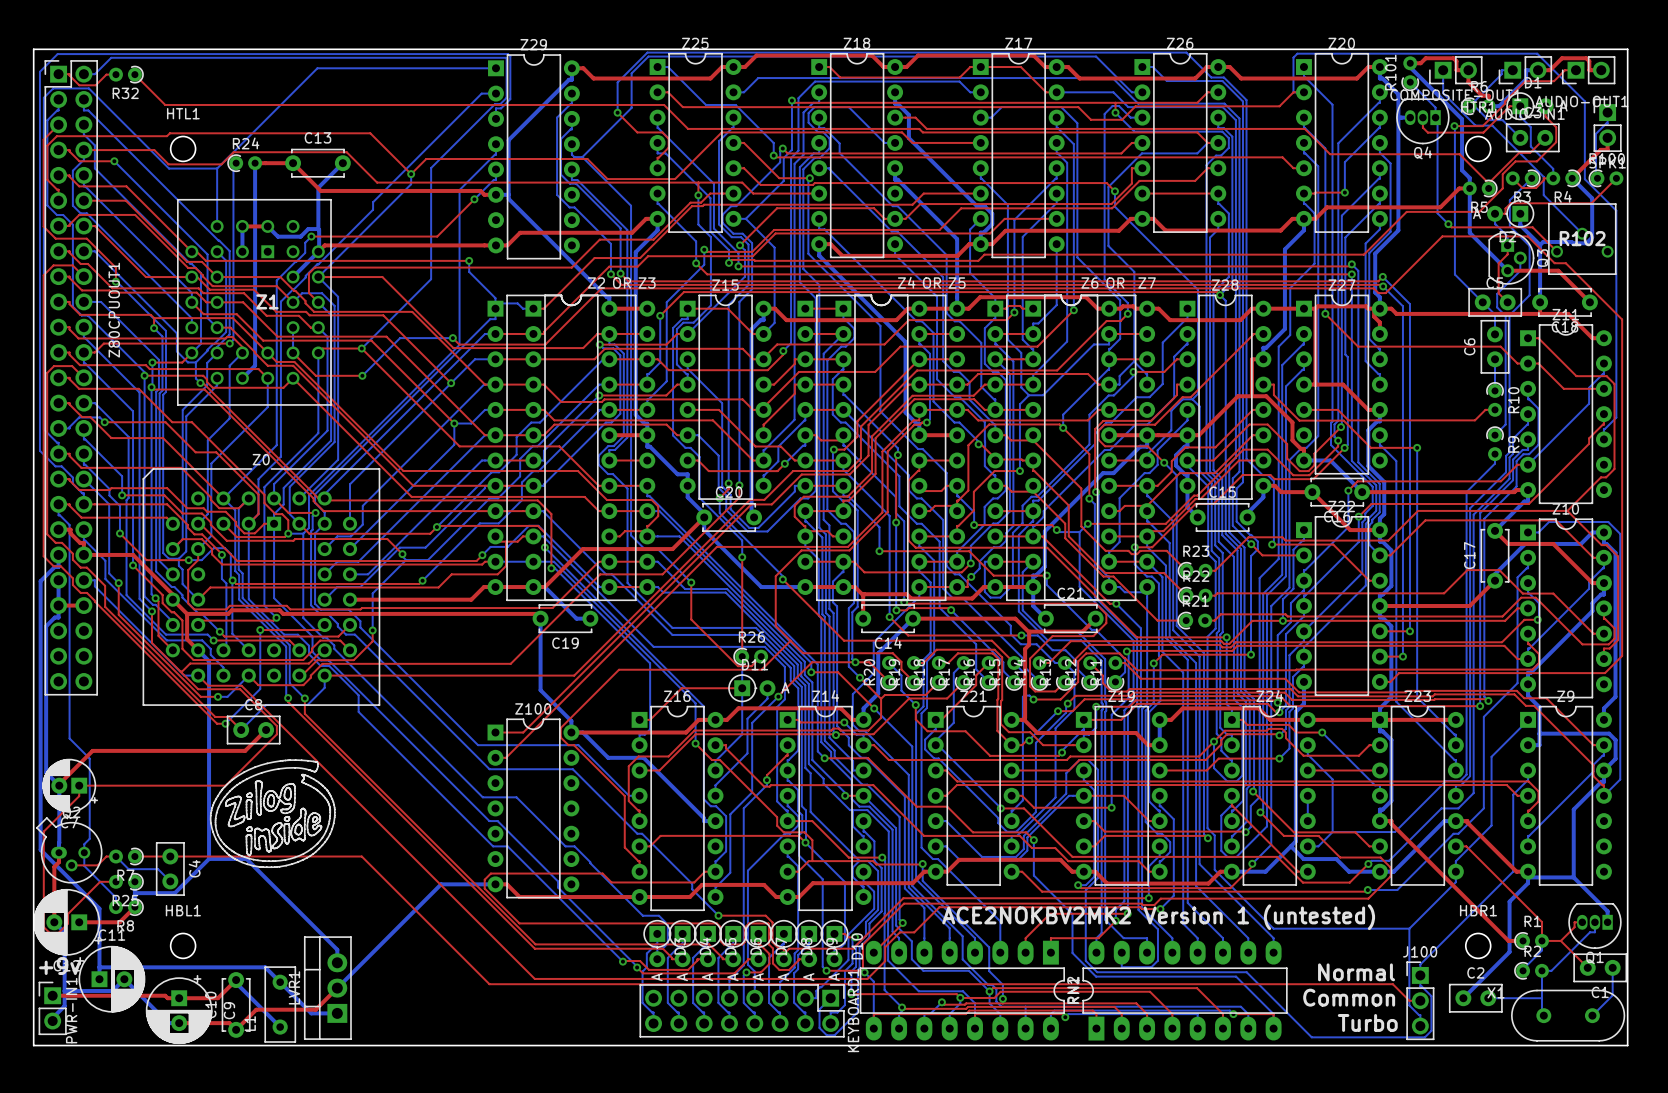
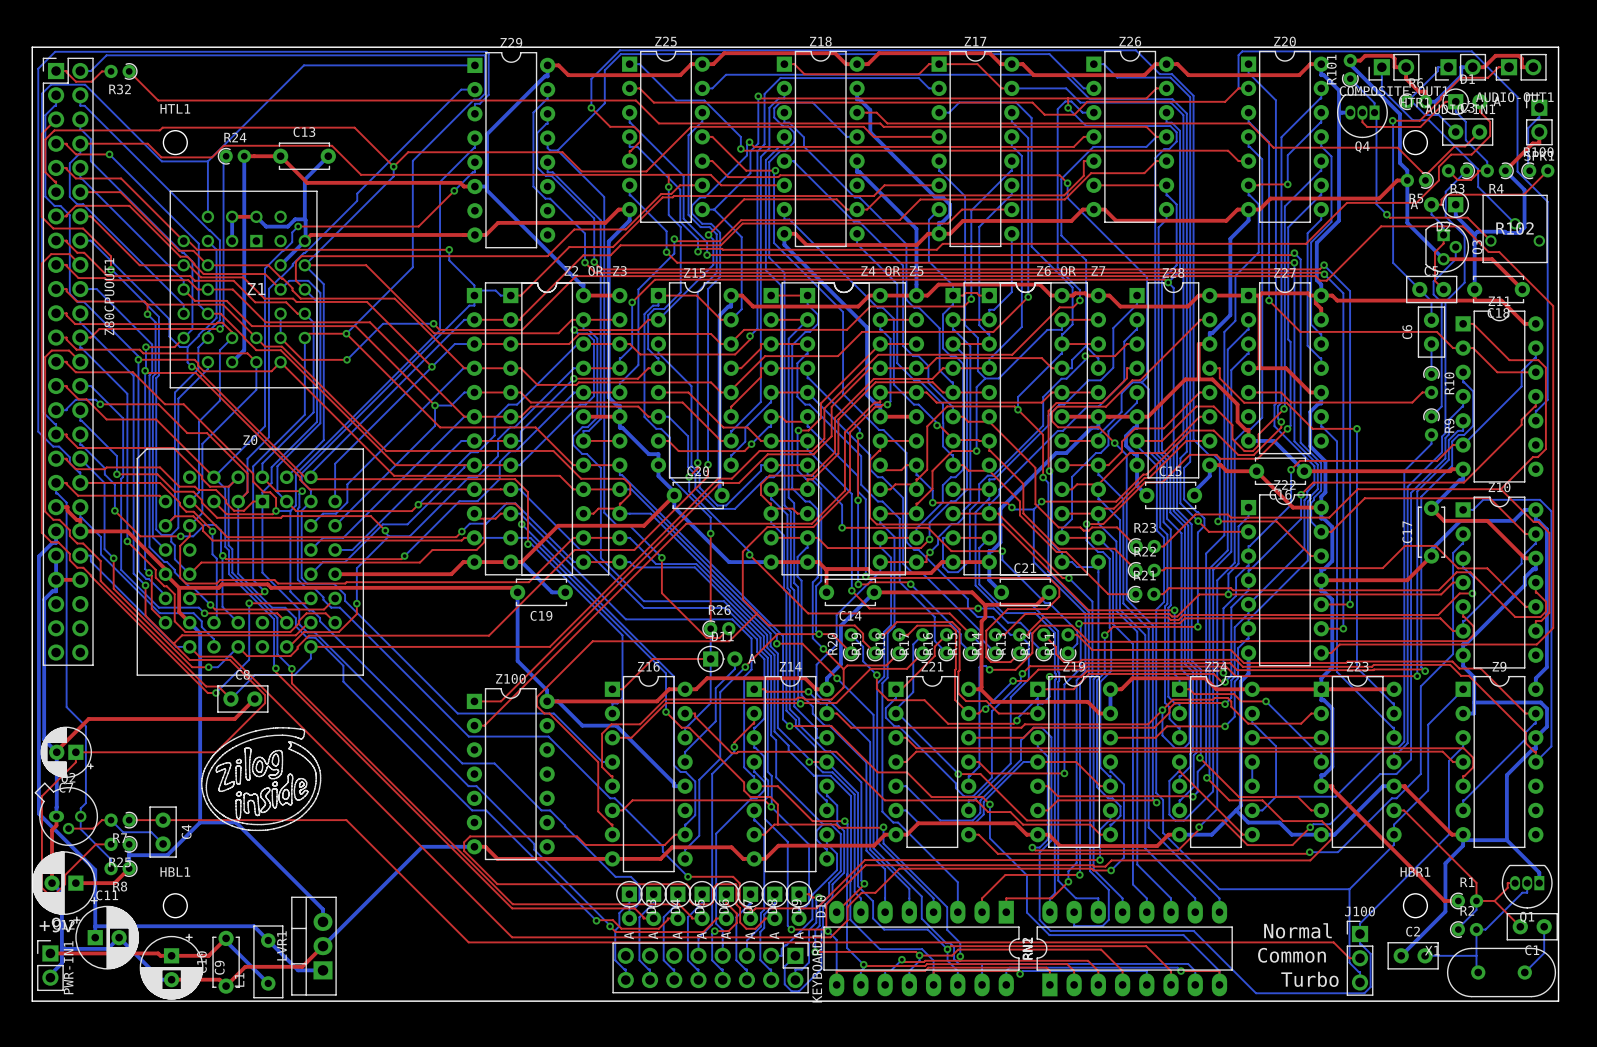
text: ACE2NOKBV2MK2 Version 1 (untested) (1158, 917) -> none

